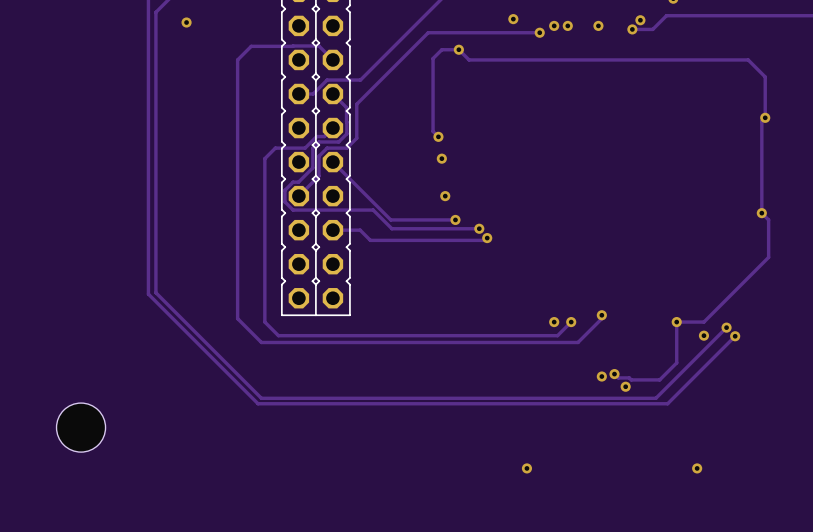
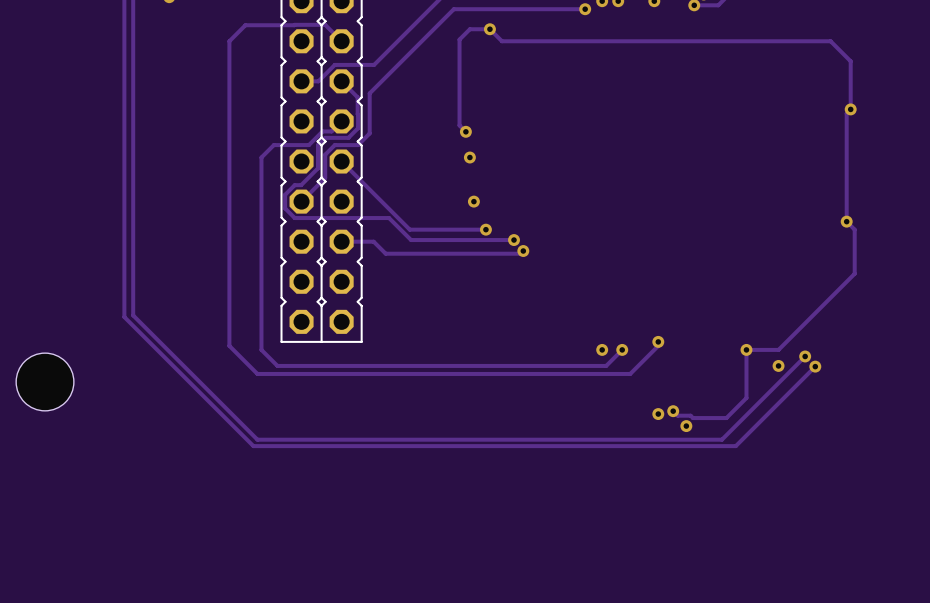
hole position: (81, 427) -> (45, 381)
via: (526, 468) -> none
via: (697, 468) -> none

